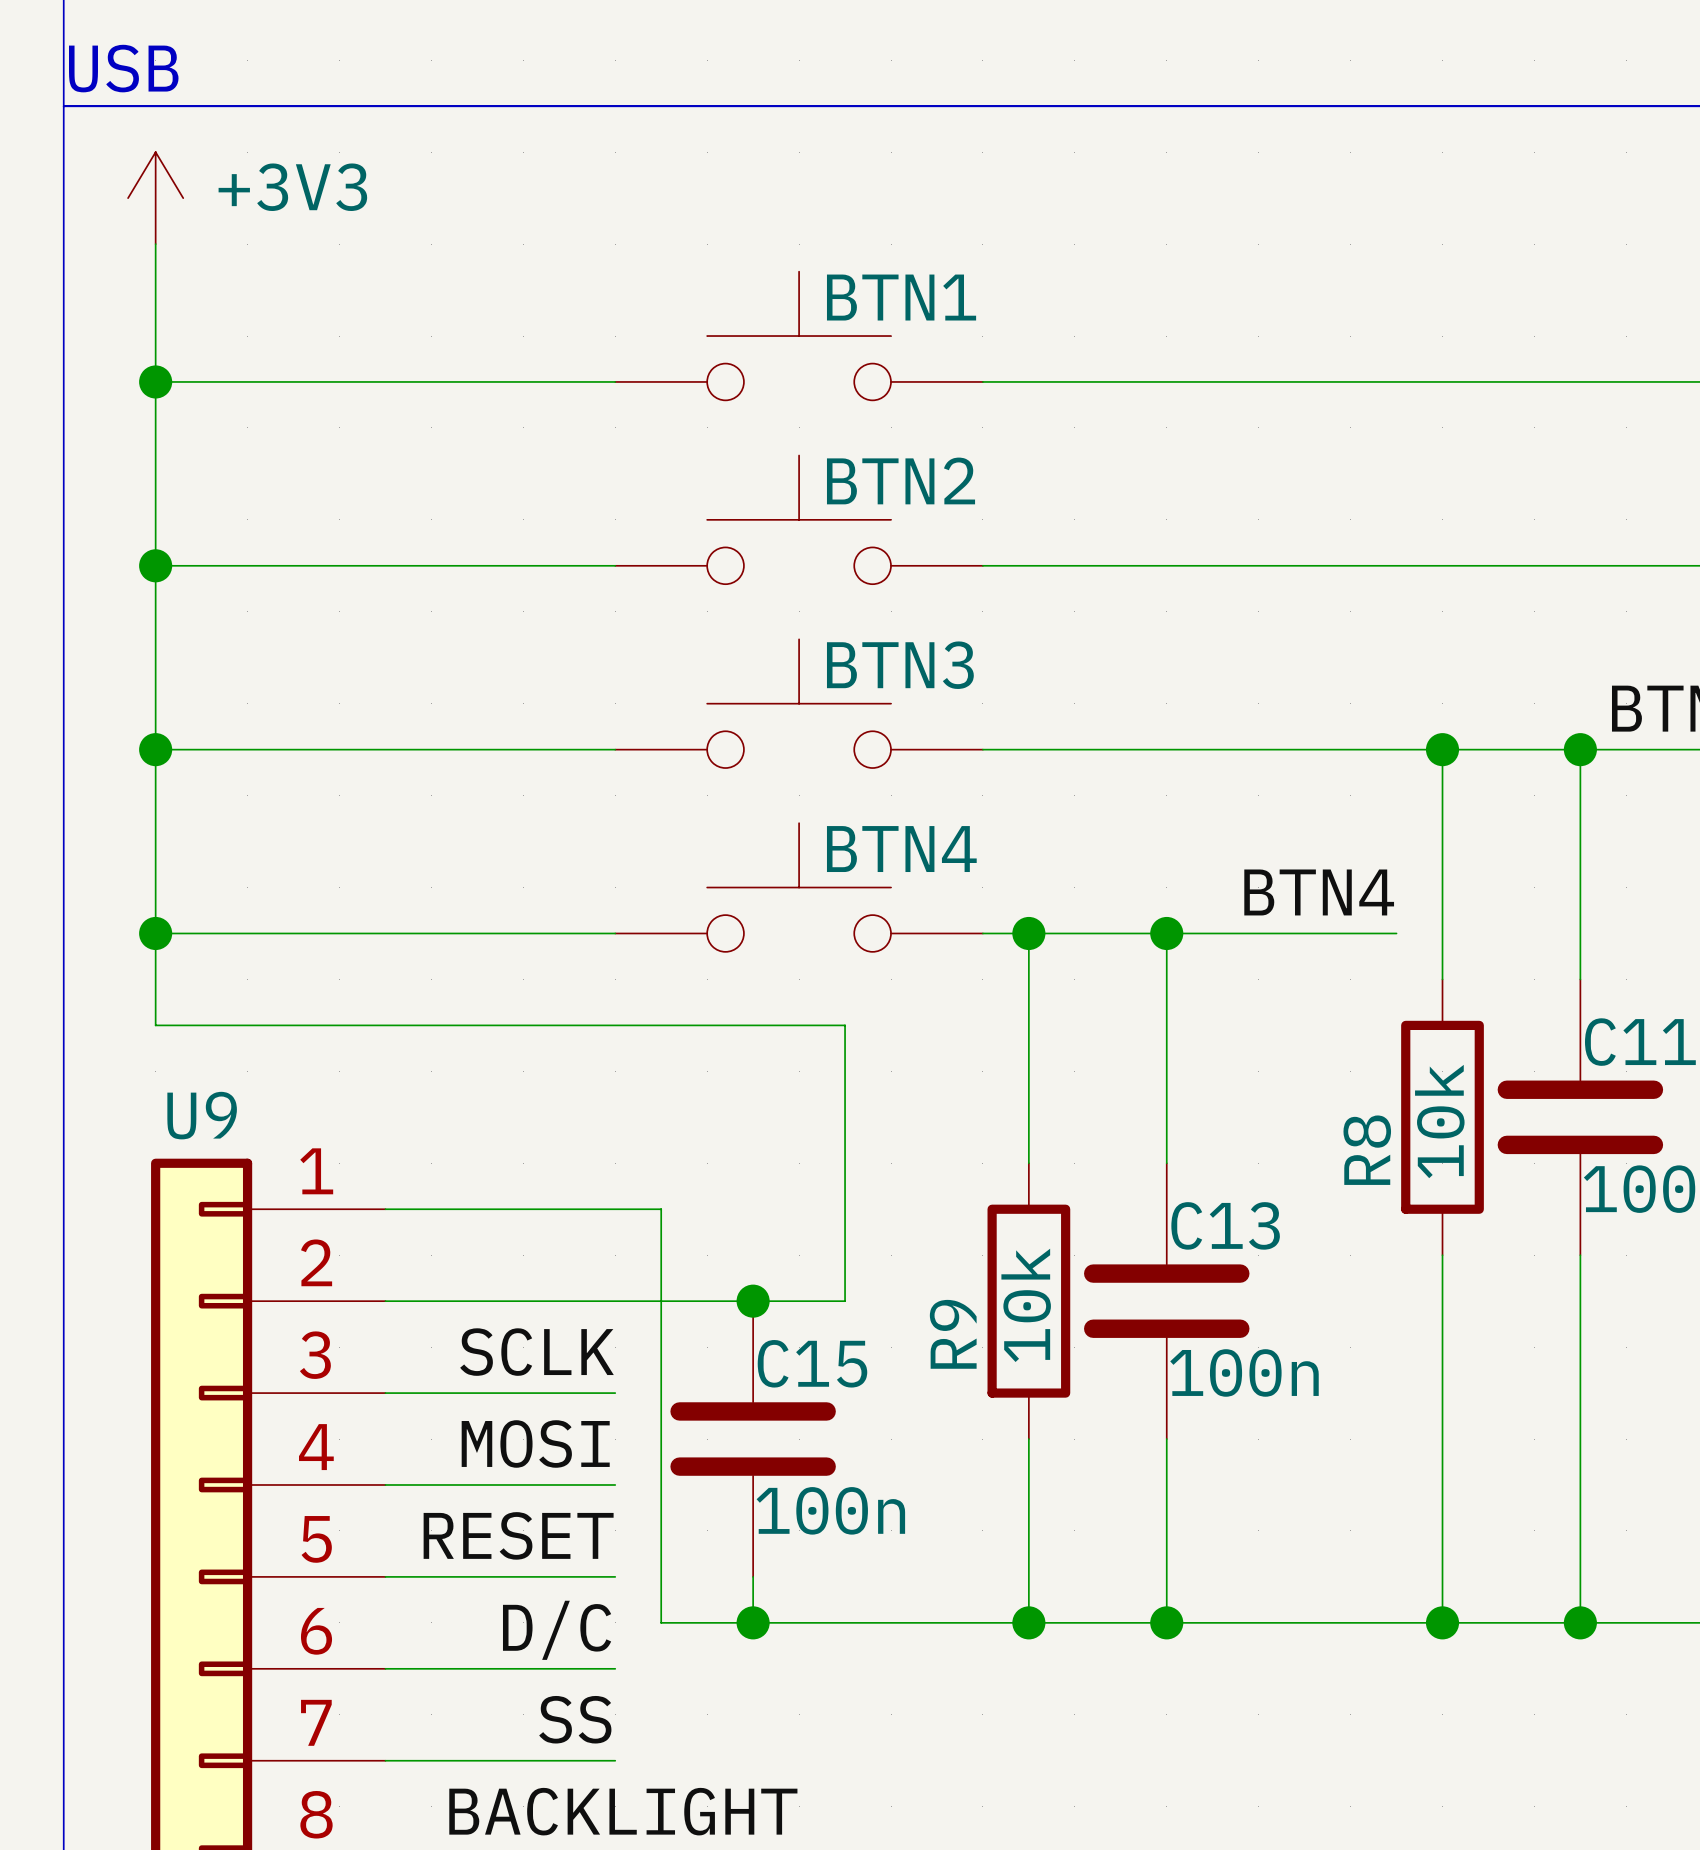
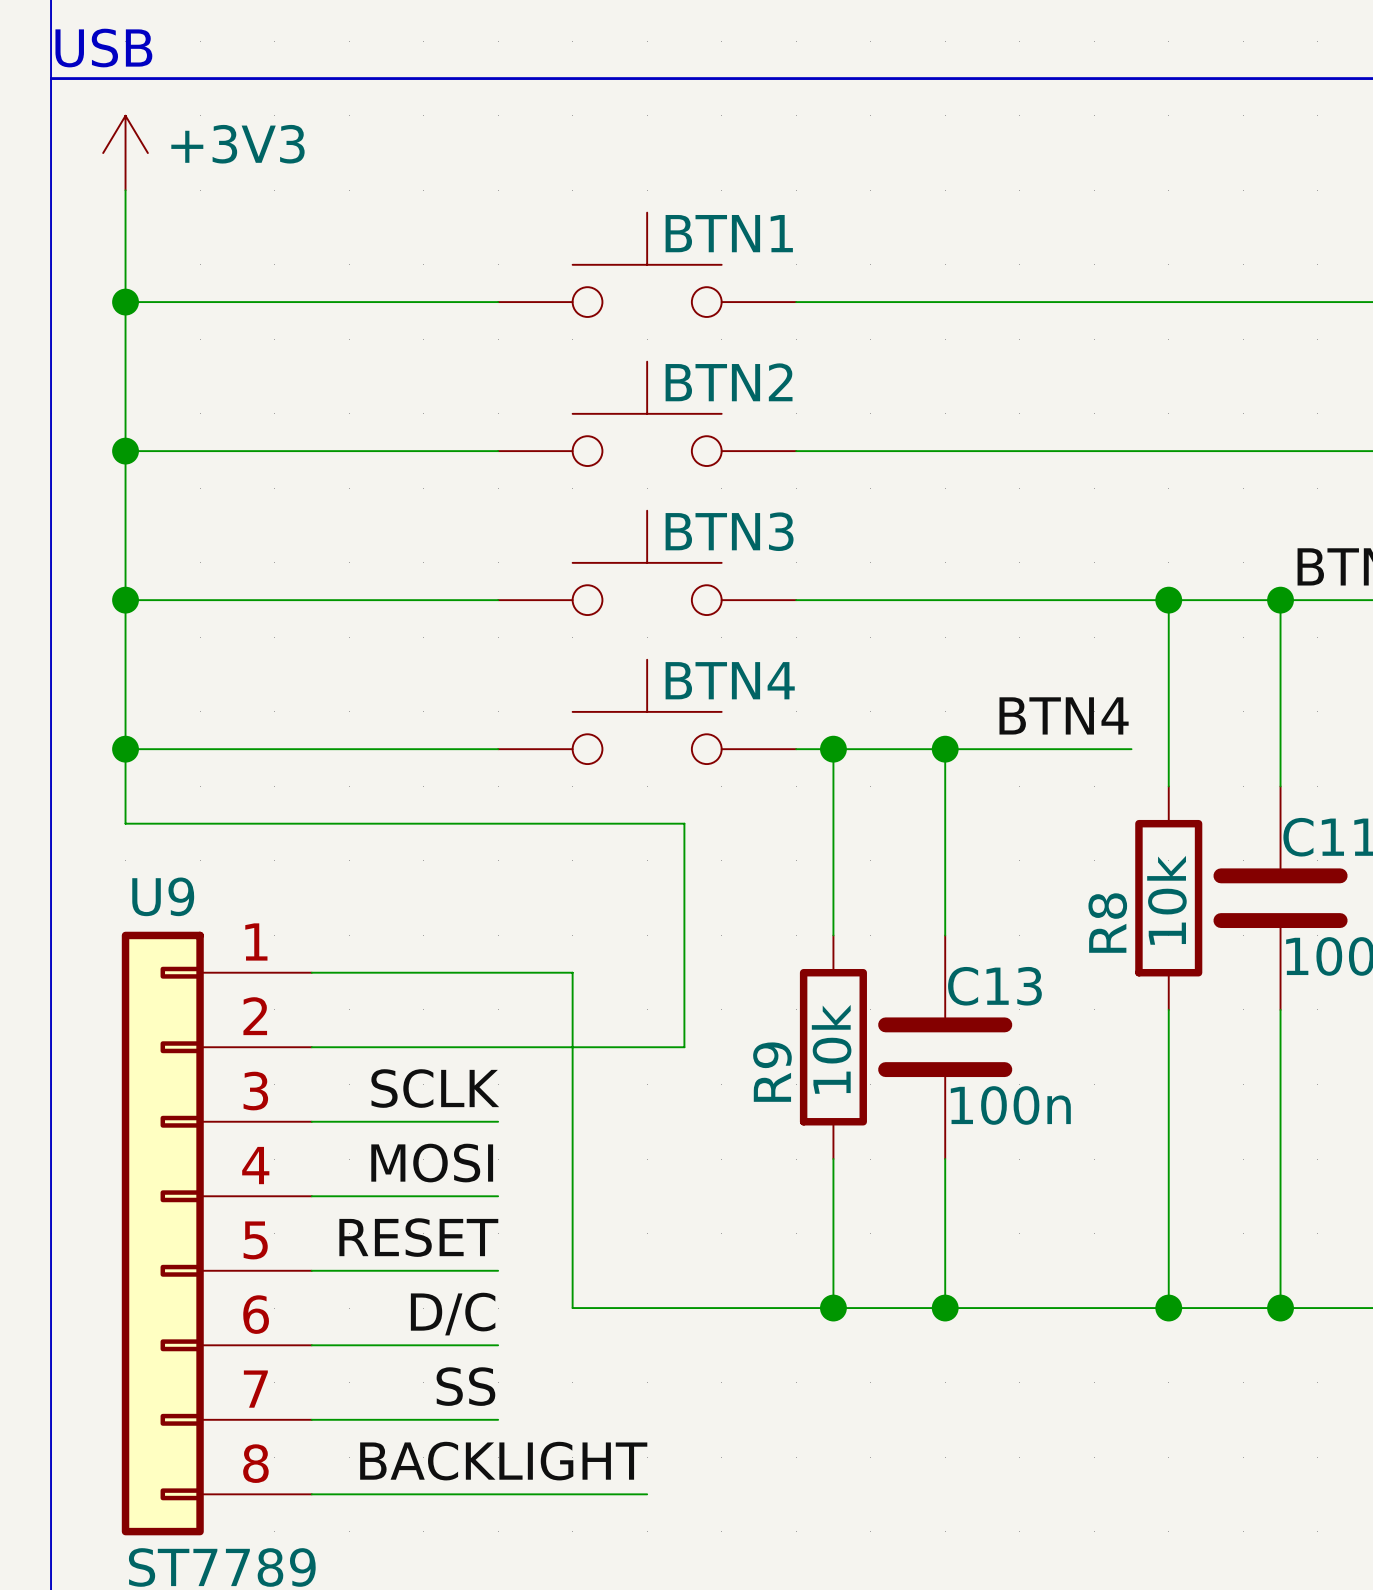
wire: (661, 1209) (661, 1622) (707, 1622) -> (535, 972) (572, 972) (572, 1308)
junction: (753, 1301) -> none
C15: 100n (753, 1439) -> none
wire: (753, 1576) (753, 1622) -> none
junction: (753, 1622) -> none

